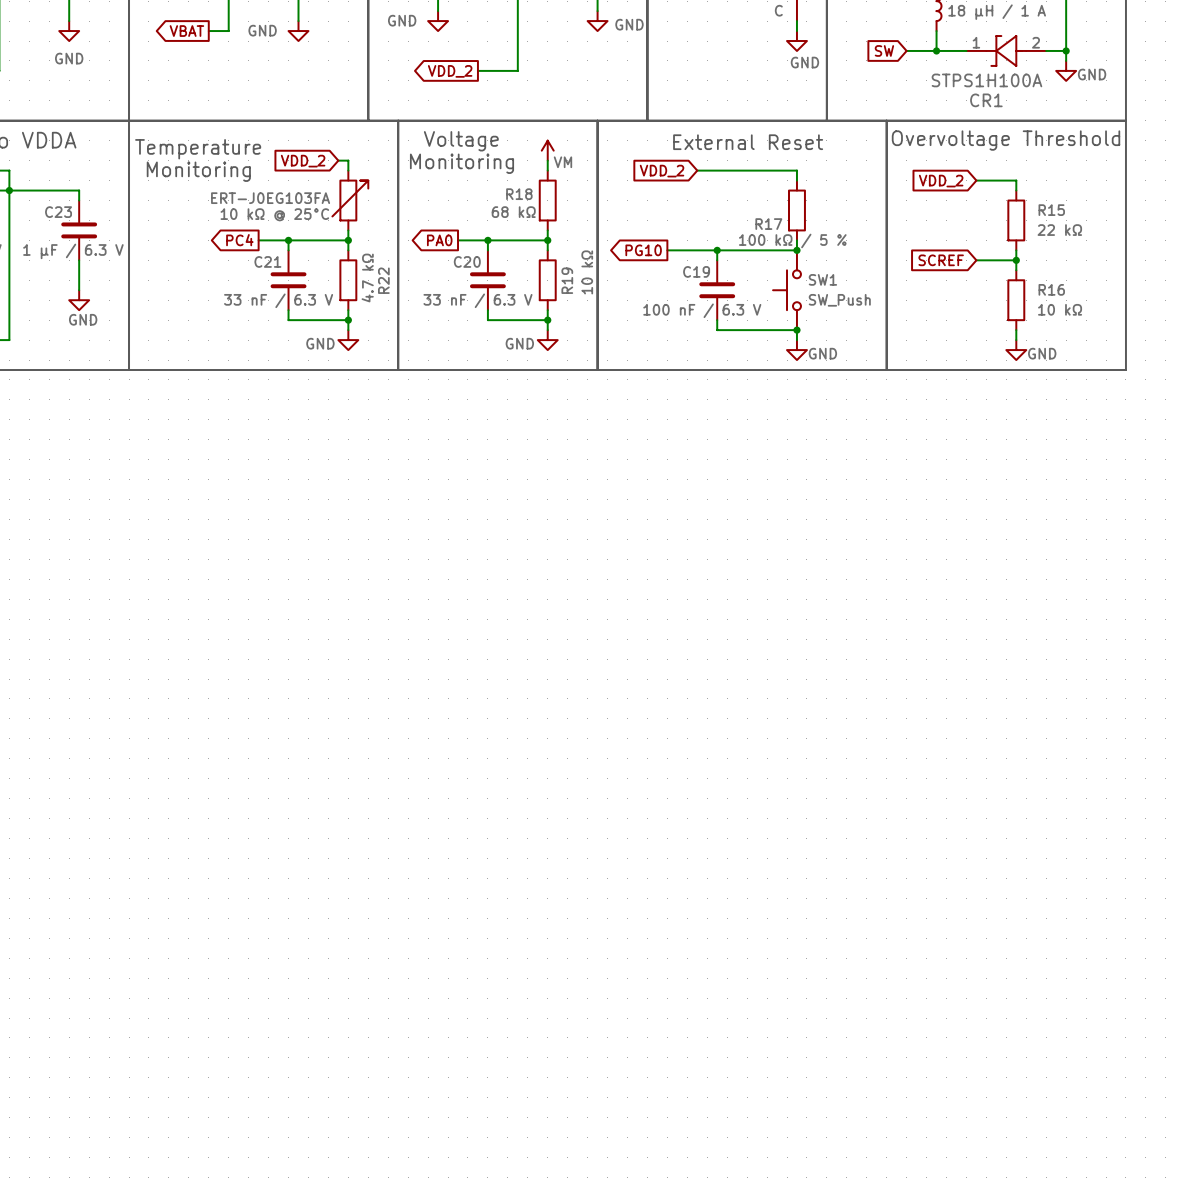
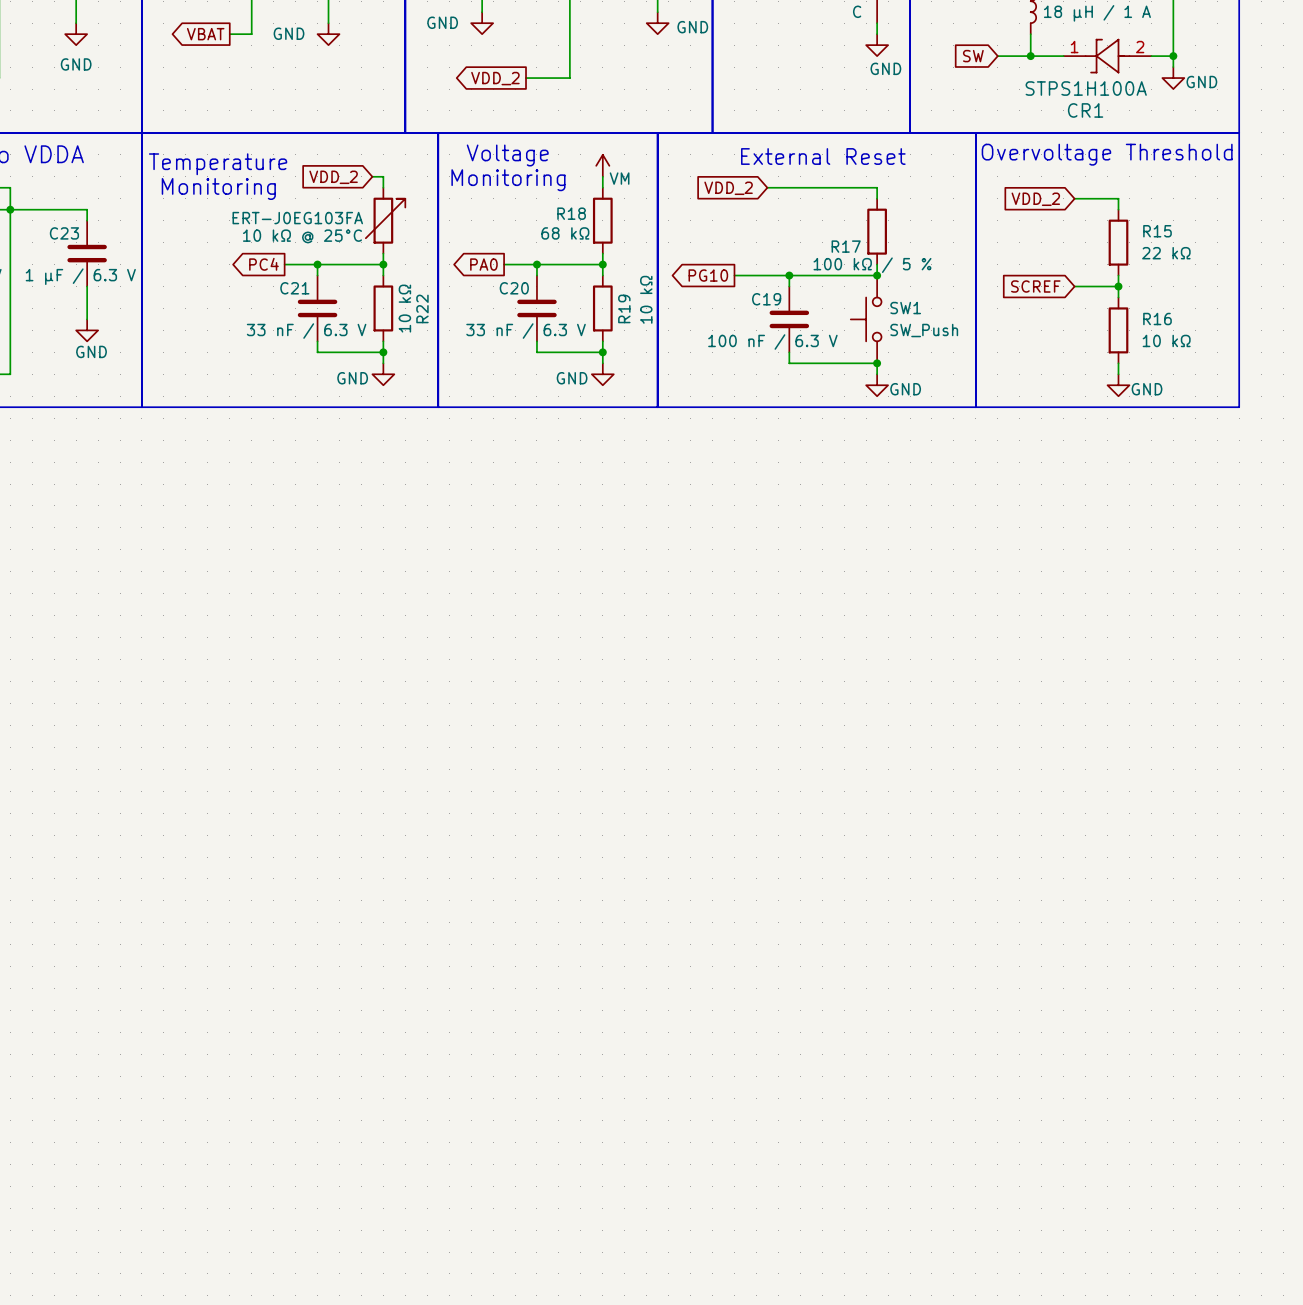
R22 value: 4.7 kΩ (367, 278) -> 10 kΩ (404, 308)

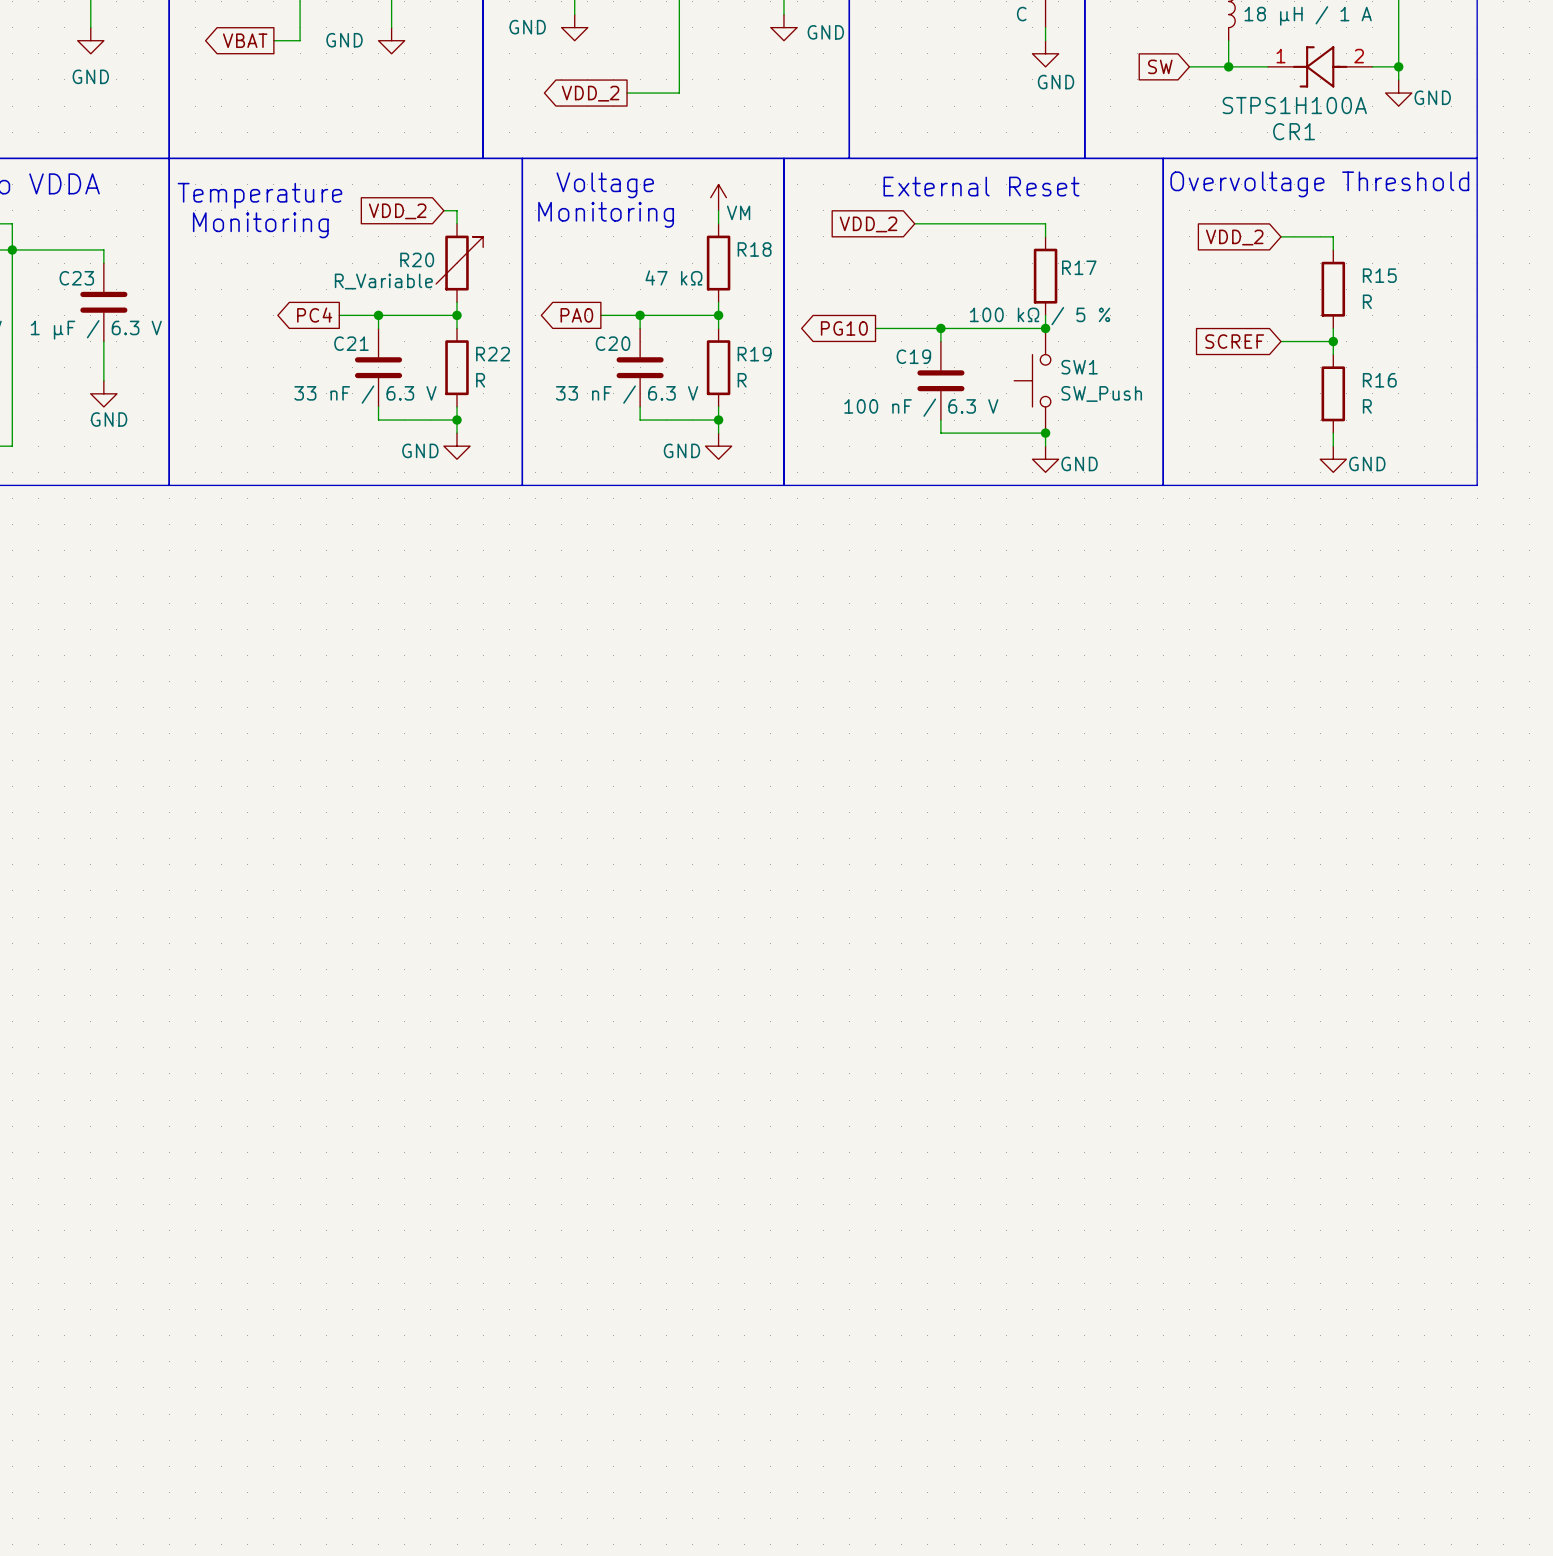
R18 name position: R18 (571, 213) -> R18 (754, 249)
ERT-J0EG103FA name: ERT-J0EG103FA (297, 218) -> R20 (417, 259)
R18 value: 68 kΩ (565, 233) -> 47 kΩ (673, 277)
ERT-J0EG103FA value: 10 kΩ @ 25°C (302, 236) -> R_Variable (383, 281)
R17 name position: R17 (846, 246) -> R17 (1079, 267)
R15 value: 22 kΩ (1166, 253) -> R (1367, 301)
R19 value: 10 kΩ (646, 299) -> R (742, 380)
R22 value: 10 kΩ (404, 308) -> R (480, 380)
R22 name rotation: 0° (422, 308) -> 90° clockwise (493, 354)
R19 name rotation: 0° (624, 308) -> 90° clockwise (754, 354)
R16 value: 10 kΩ (1166, 340) -> R (1367, 406)

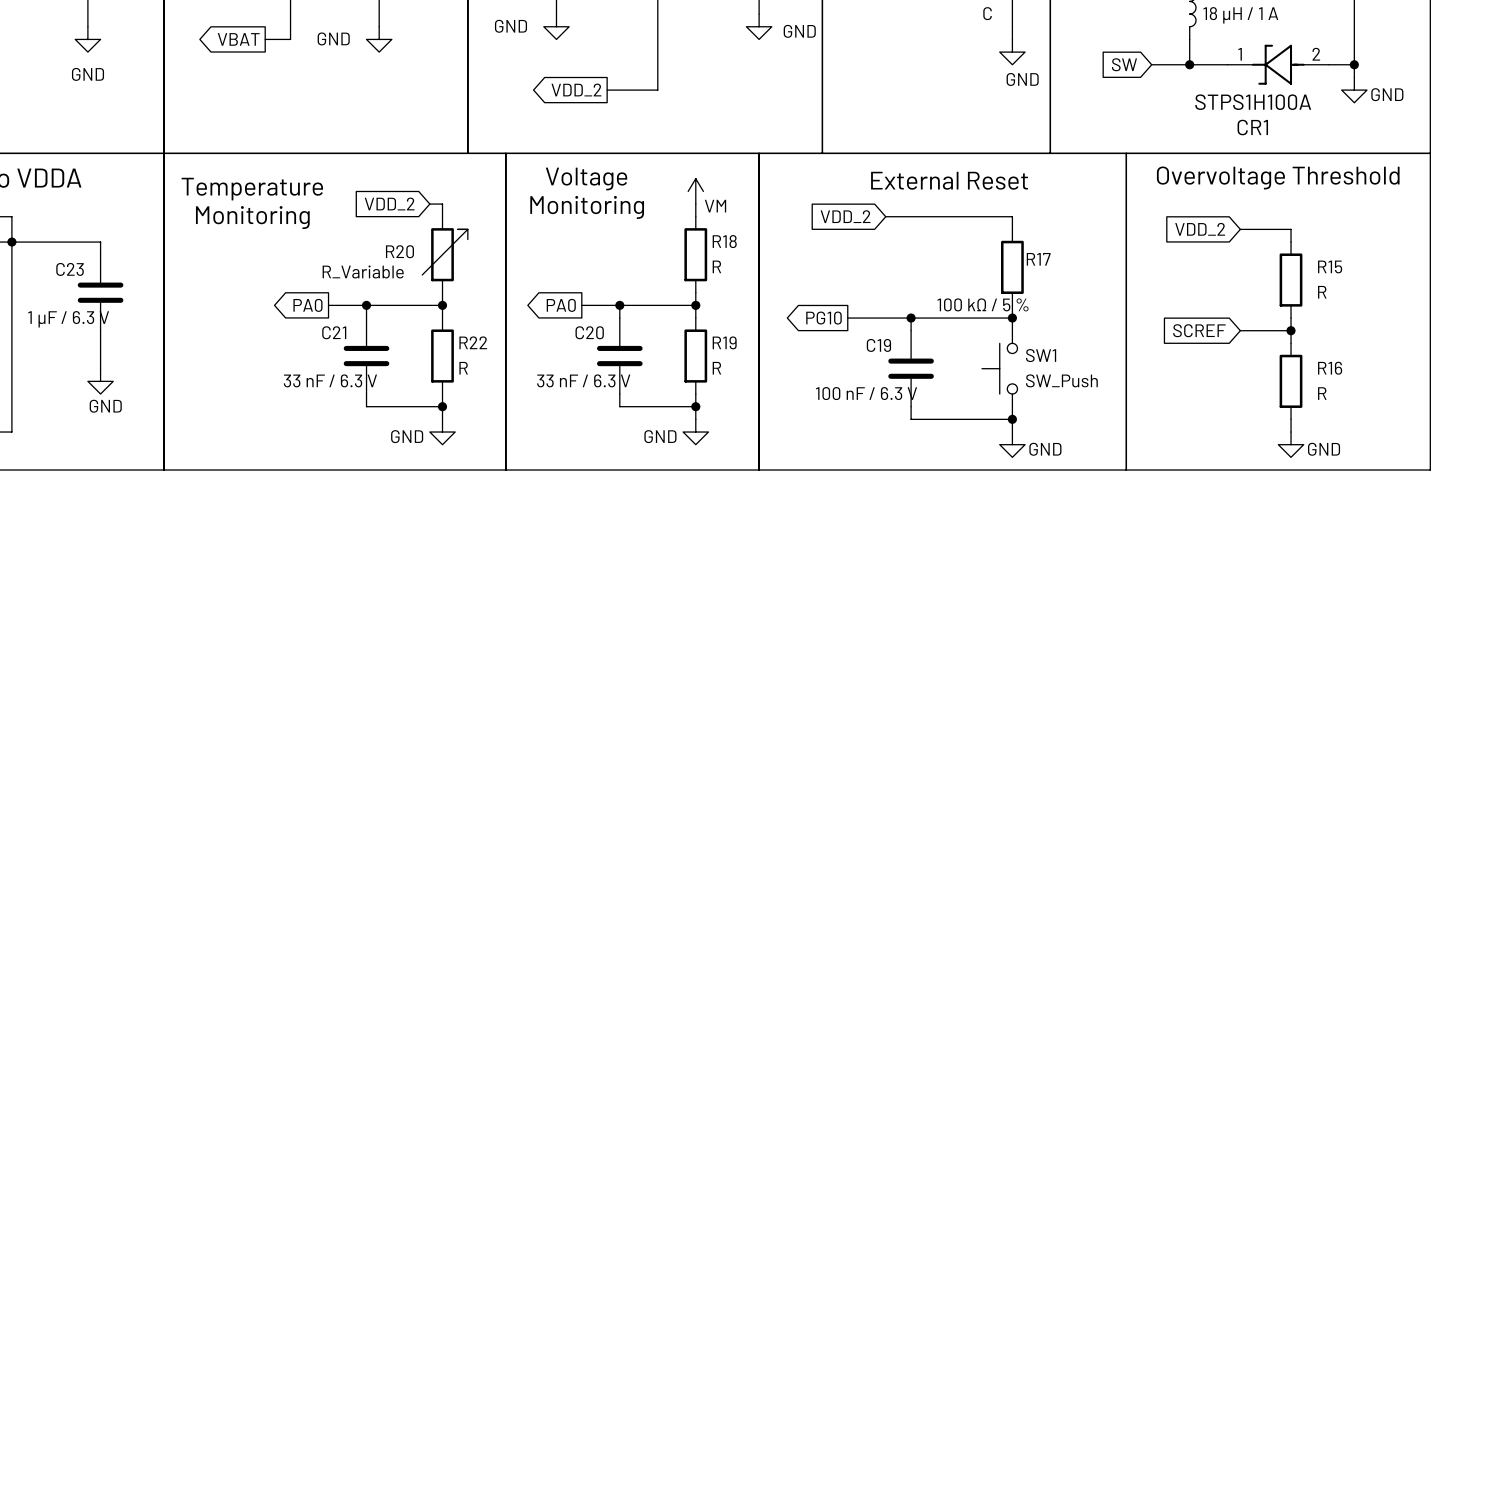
R18 value: 47 kΩ (673, 277) -> R (716, 266)
global label: PC4 (314, 315) -> PA0 (307, 305)

